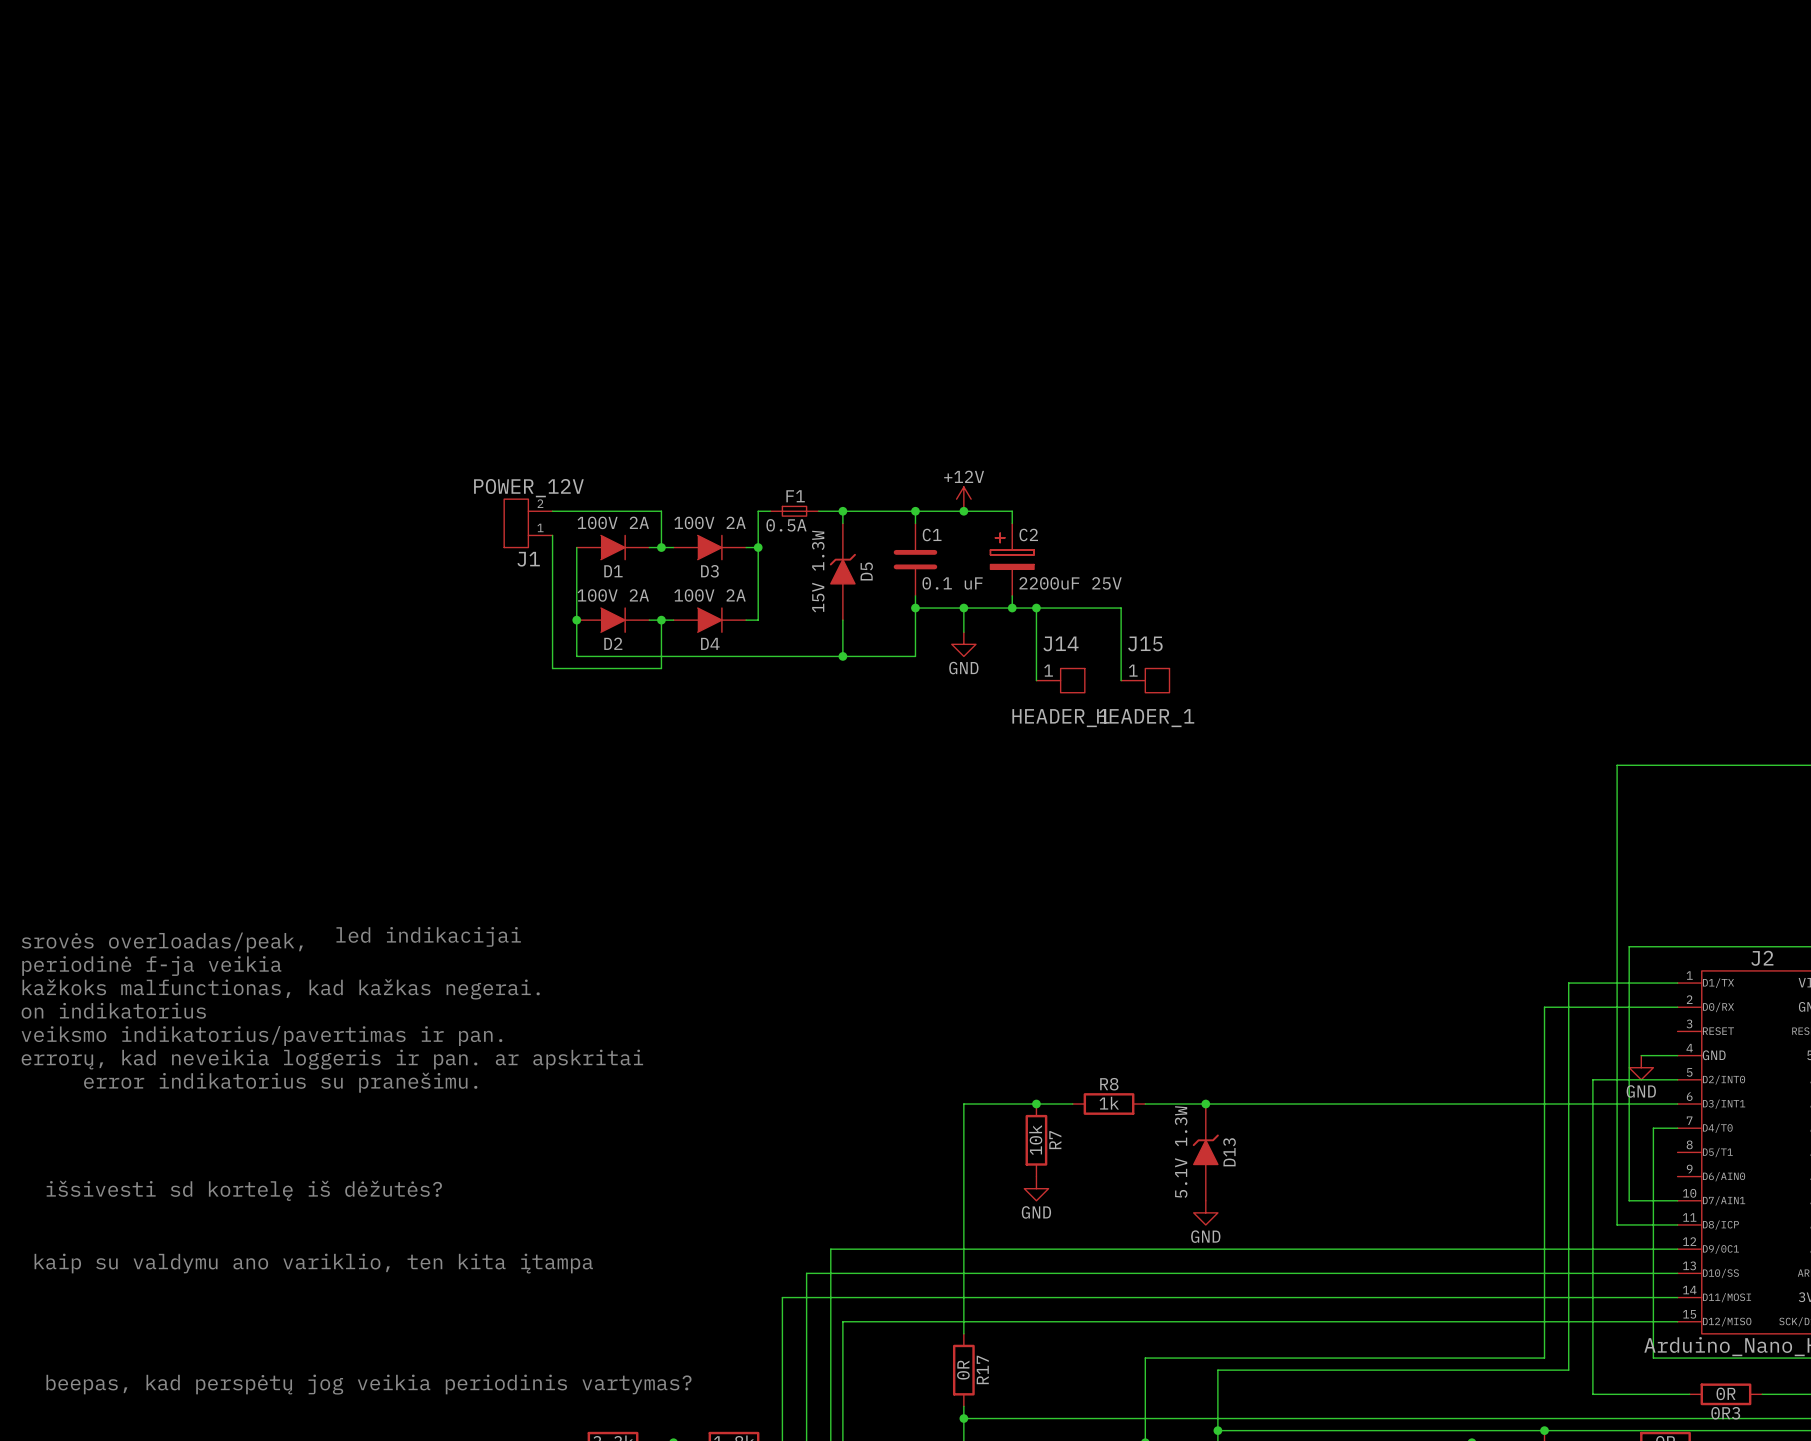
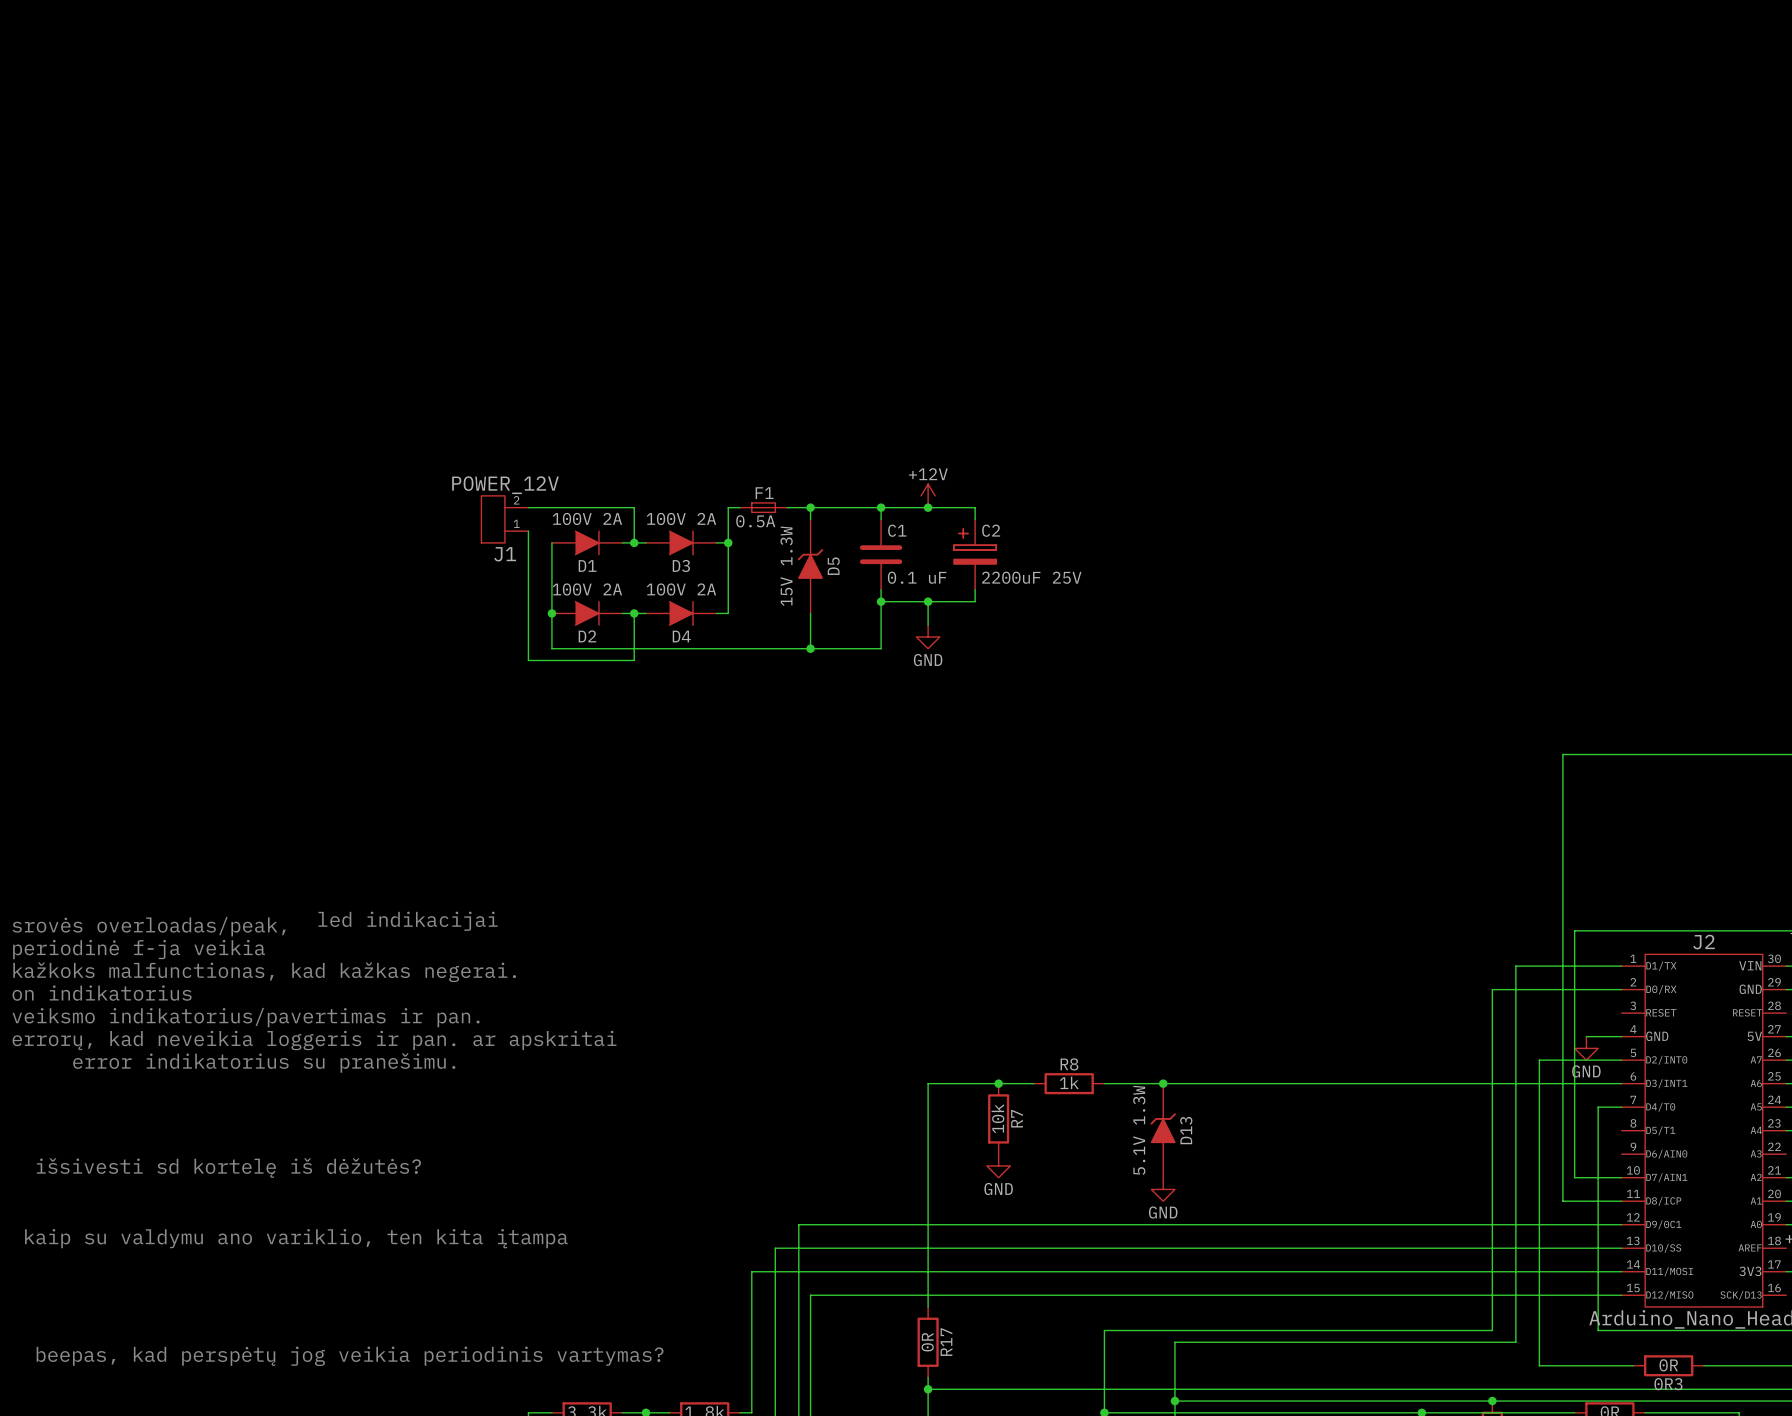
wire: (1012, 608) (1121, 608) (1121, 680) -> none
junction: (1012, 608) -> none
wire: (1036, 608) (1036, 680) -> none
junction: (1036, 608) -> none
J14: HEADER_1 (1060, 680) -> none
J15: HEADER_1 (1145, 680) -> none

